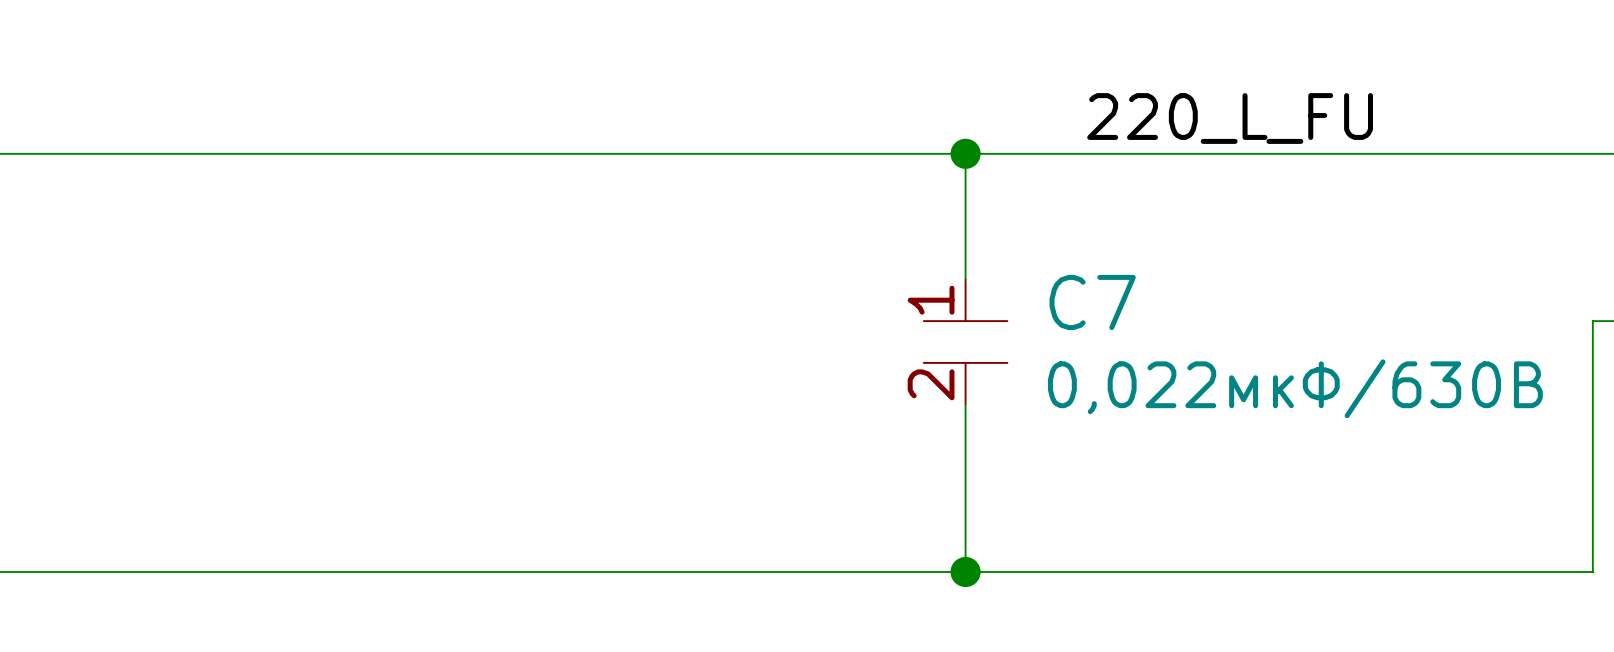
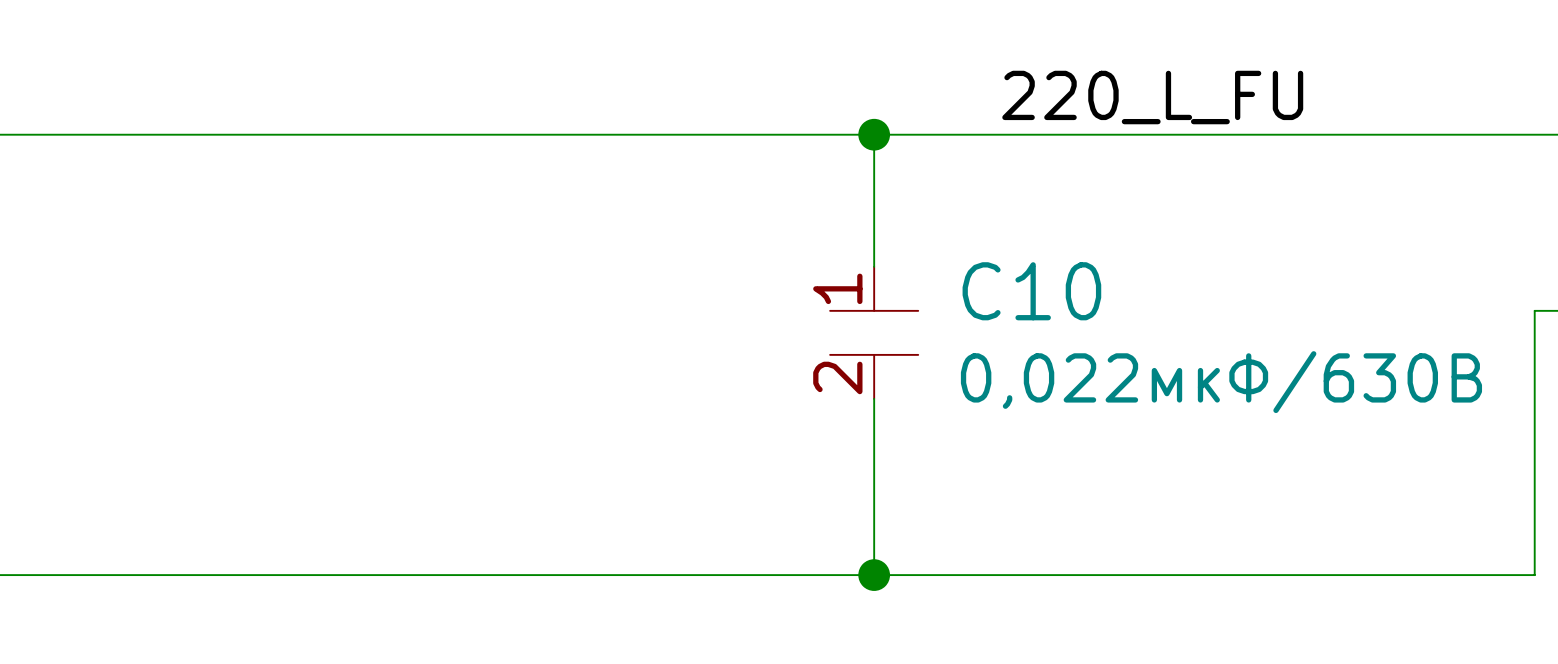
C7 name: C7 (1092, 302) -> C10 (1031, 291)

